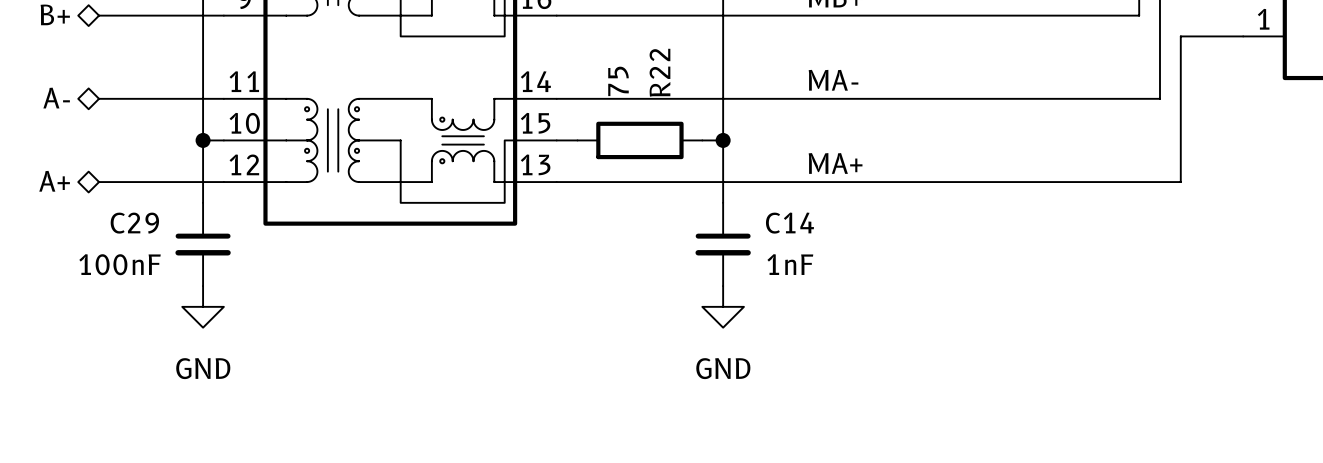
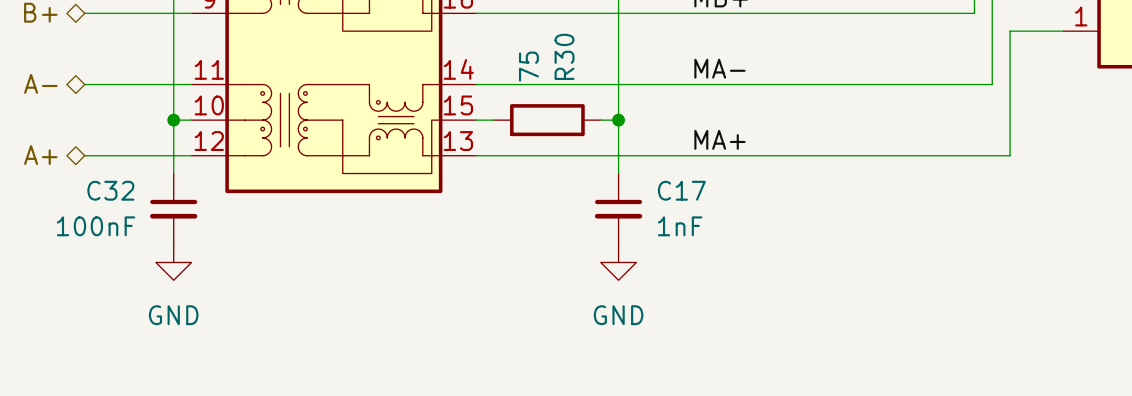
R22 name: R22 (659, 72) -> R30 (564, 56)
C29 name: C29 (134, 223) -> C32 (110, 190)
C14 name: C14 (789, 223) -> C17 (681, 190)

